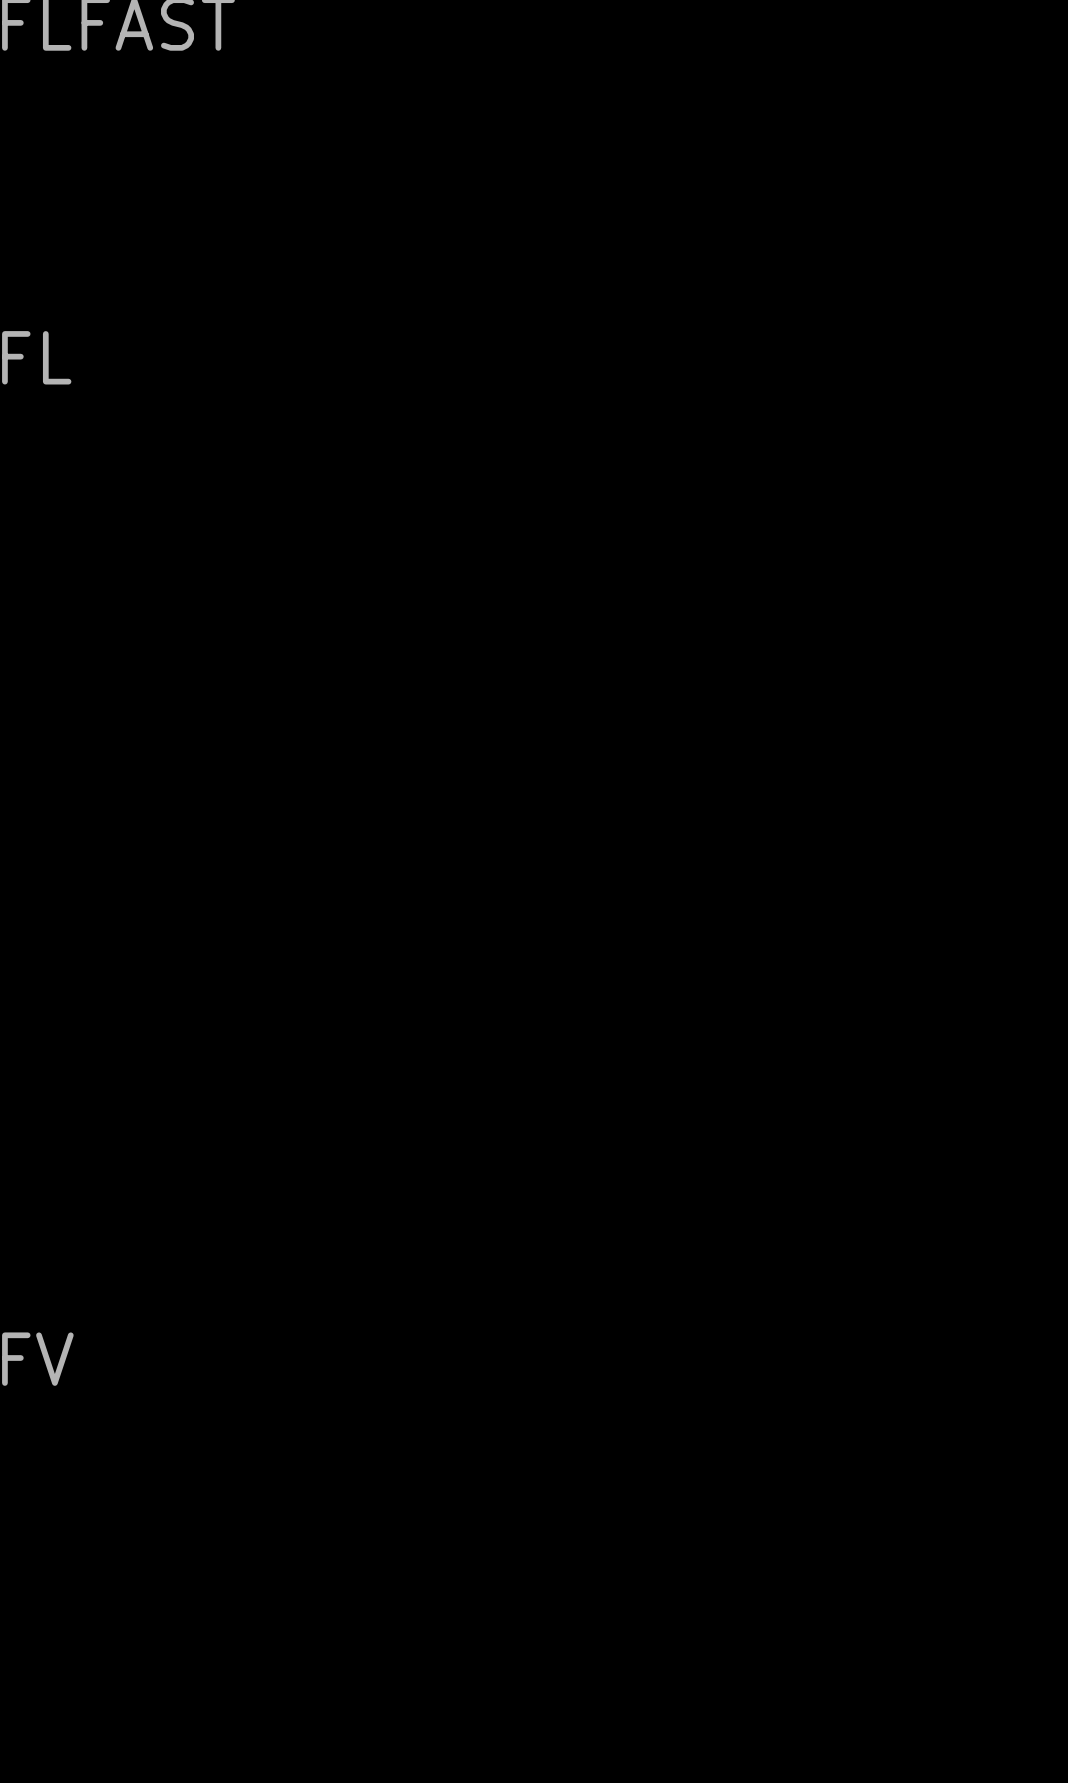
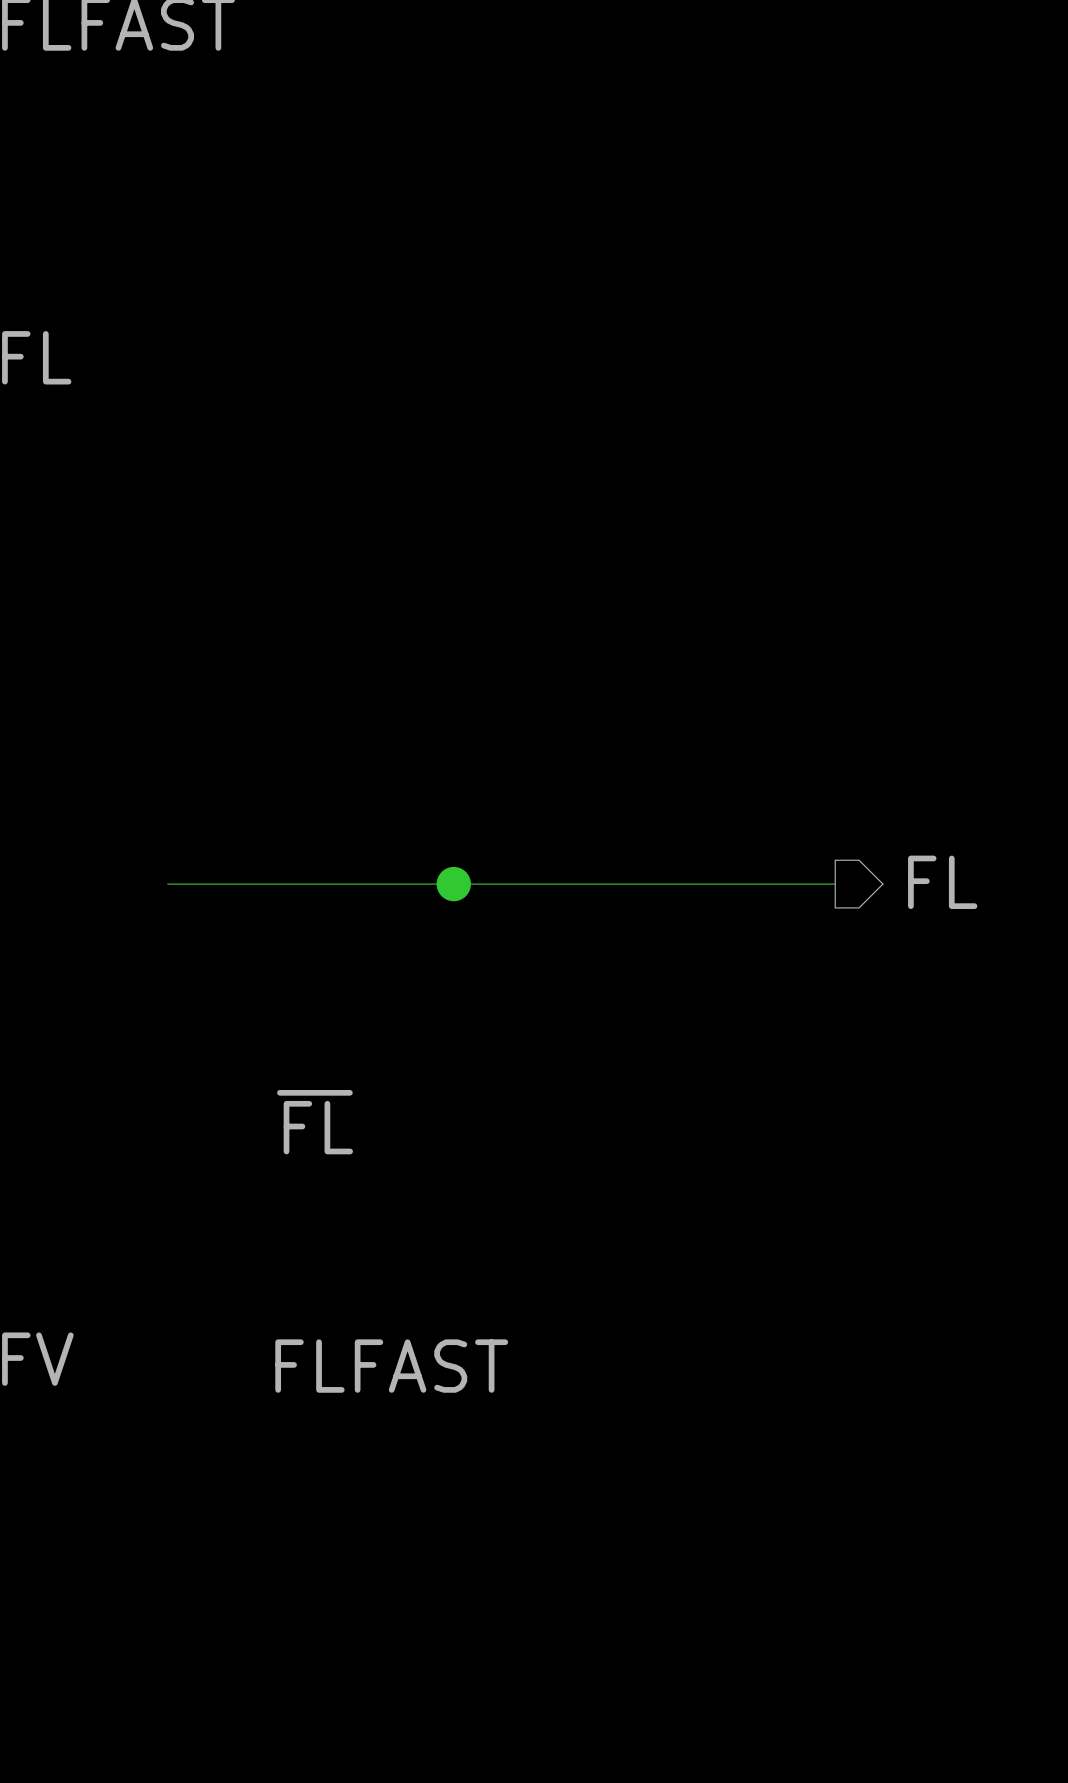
hierarchical label: none -> FL (942, 882)
wire: none -> (167, 884) (835, 884)
junction: none -> (453, 884)
label: none -> ~{FL} (315, 1122)
label: none -> FLFAST (391, 1366)

